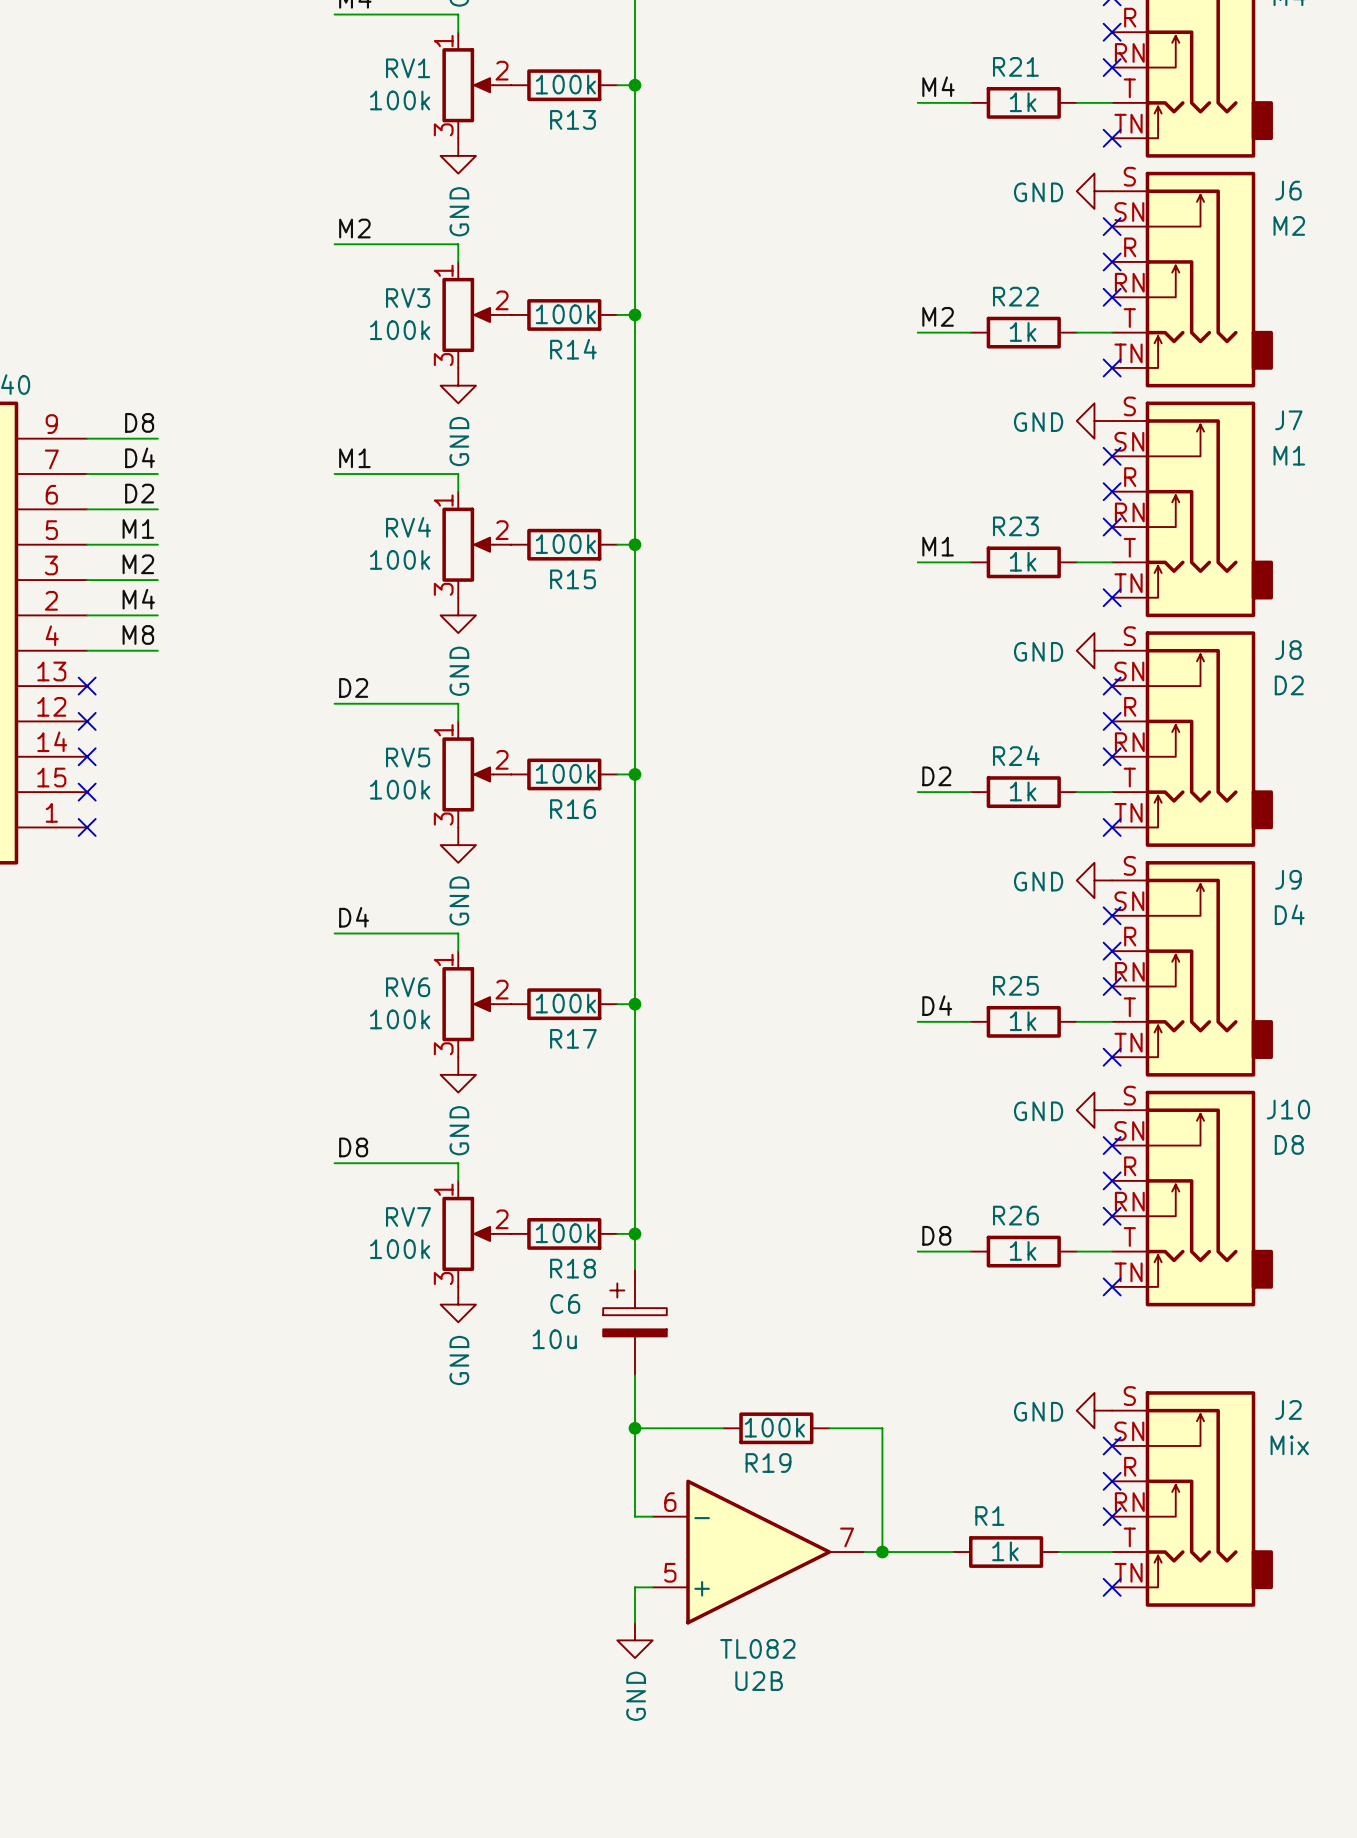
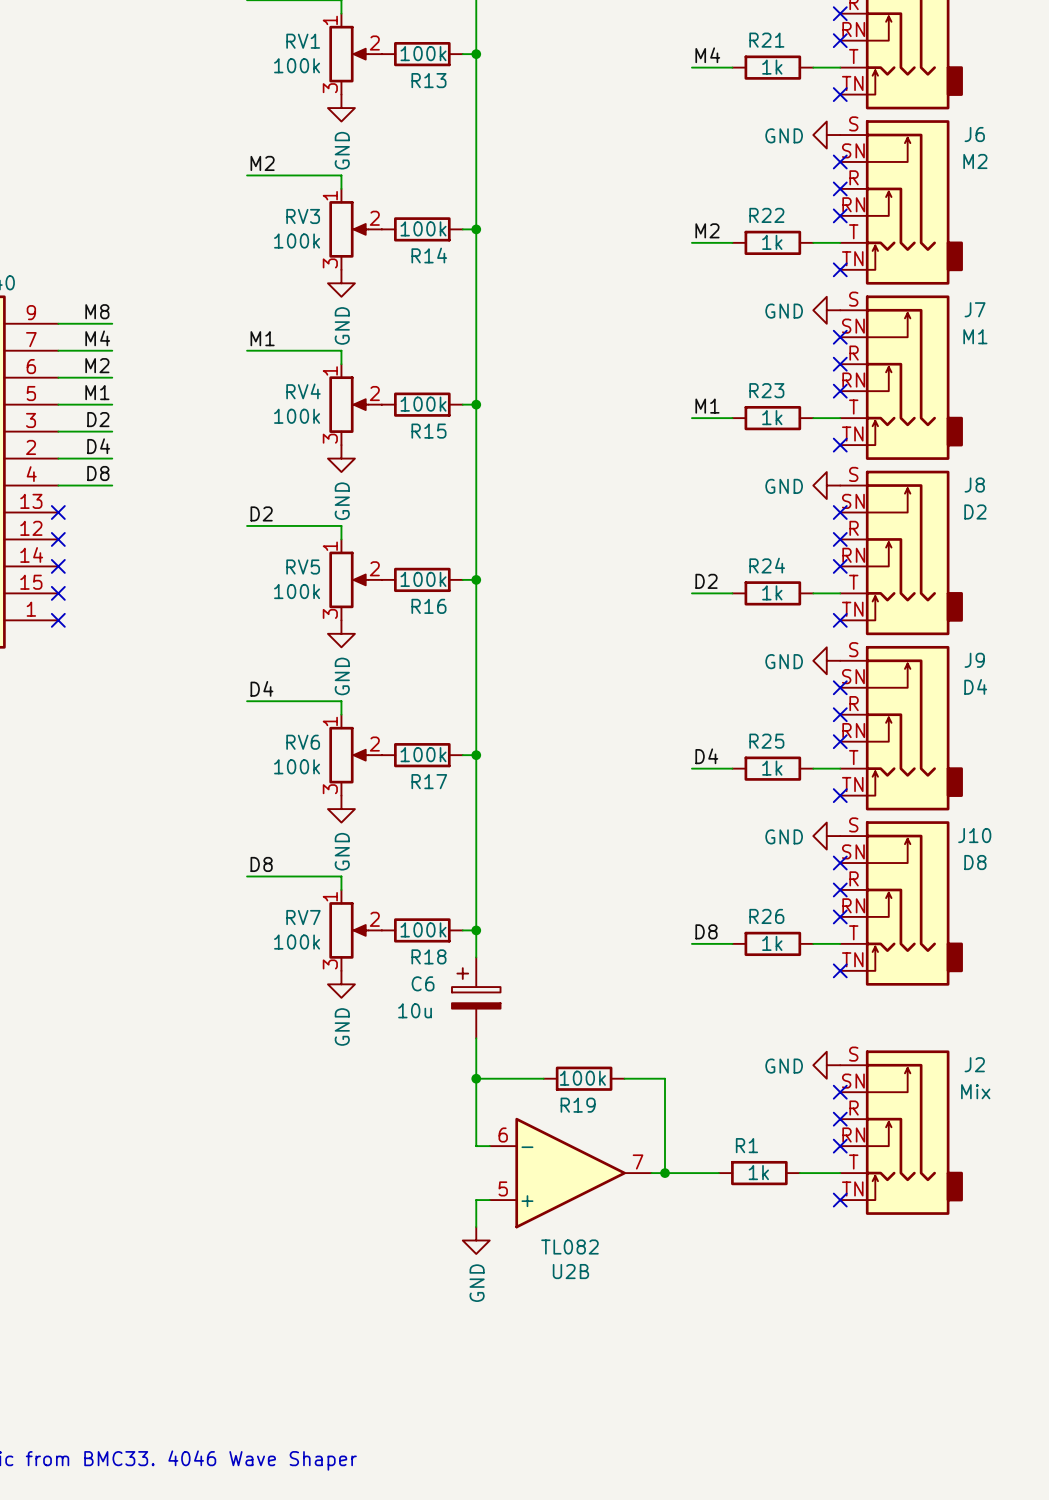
label: D8 (139, 422) -> M8 (97, 311)
label: D4 (140, 457) -> M4 (97, 338)
label: D2 (139, 493) -> M2 (97, 365)
label: M2 (138, 564) -> D2 (98, 419)
label: M4 (138, 599) -> D4 (98, 446)
label: M8 (138, 634) -> D8 (98, 473)

